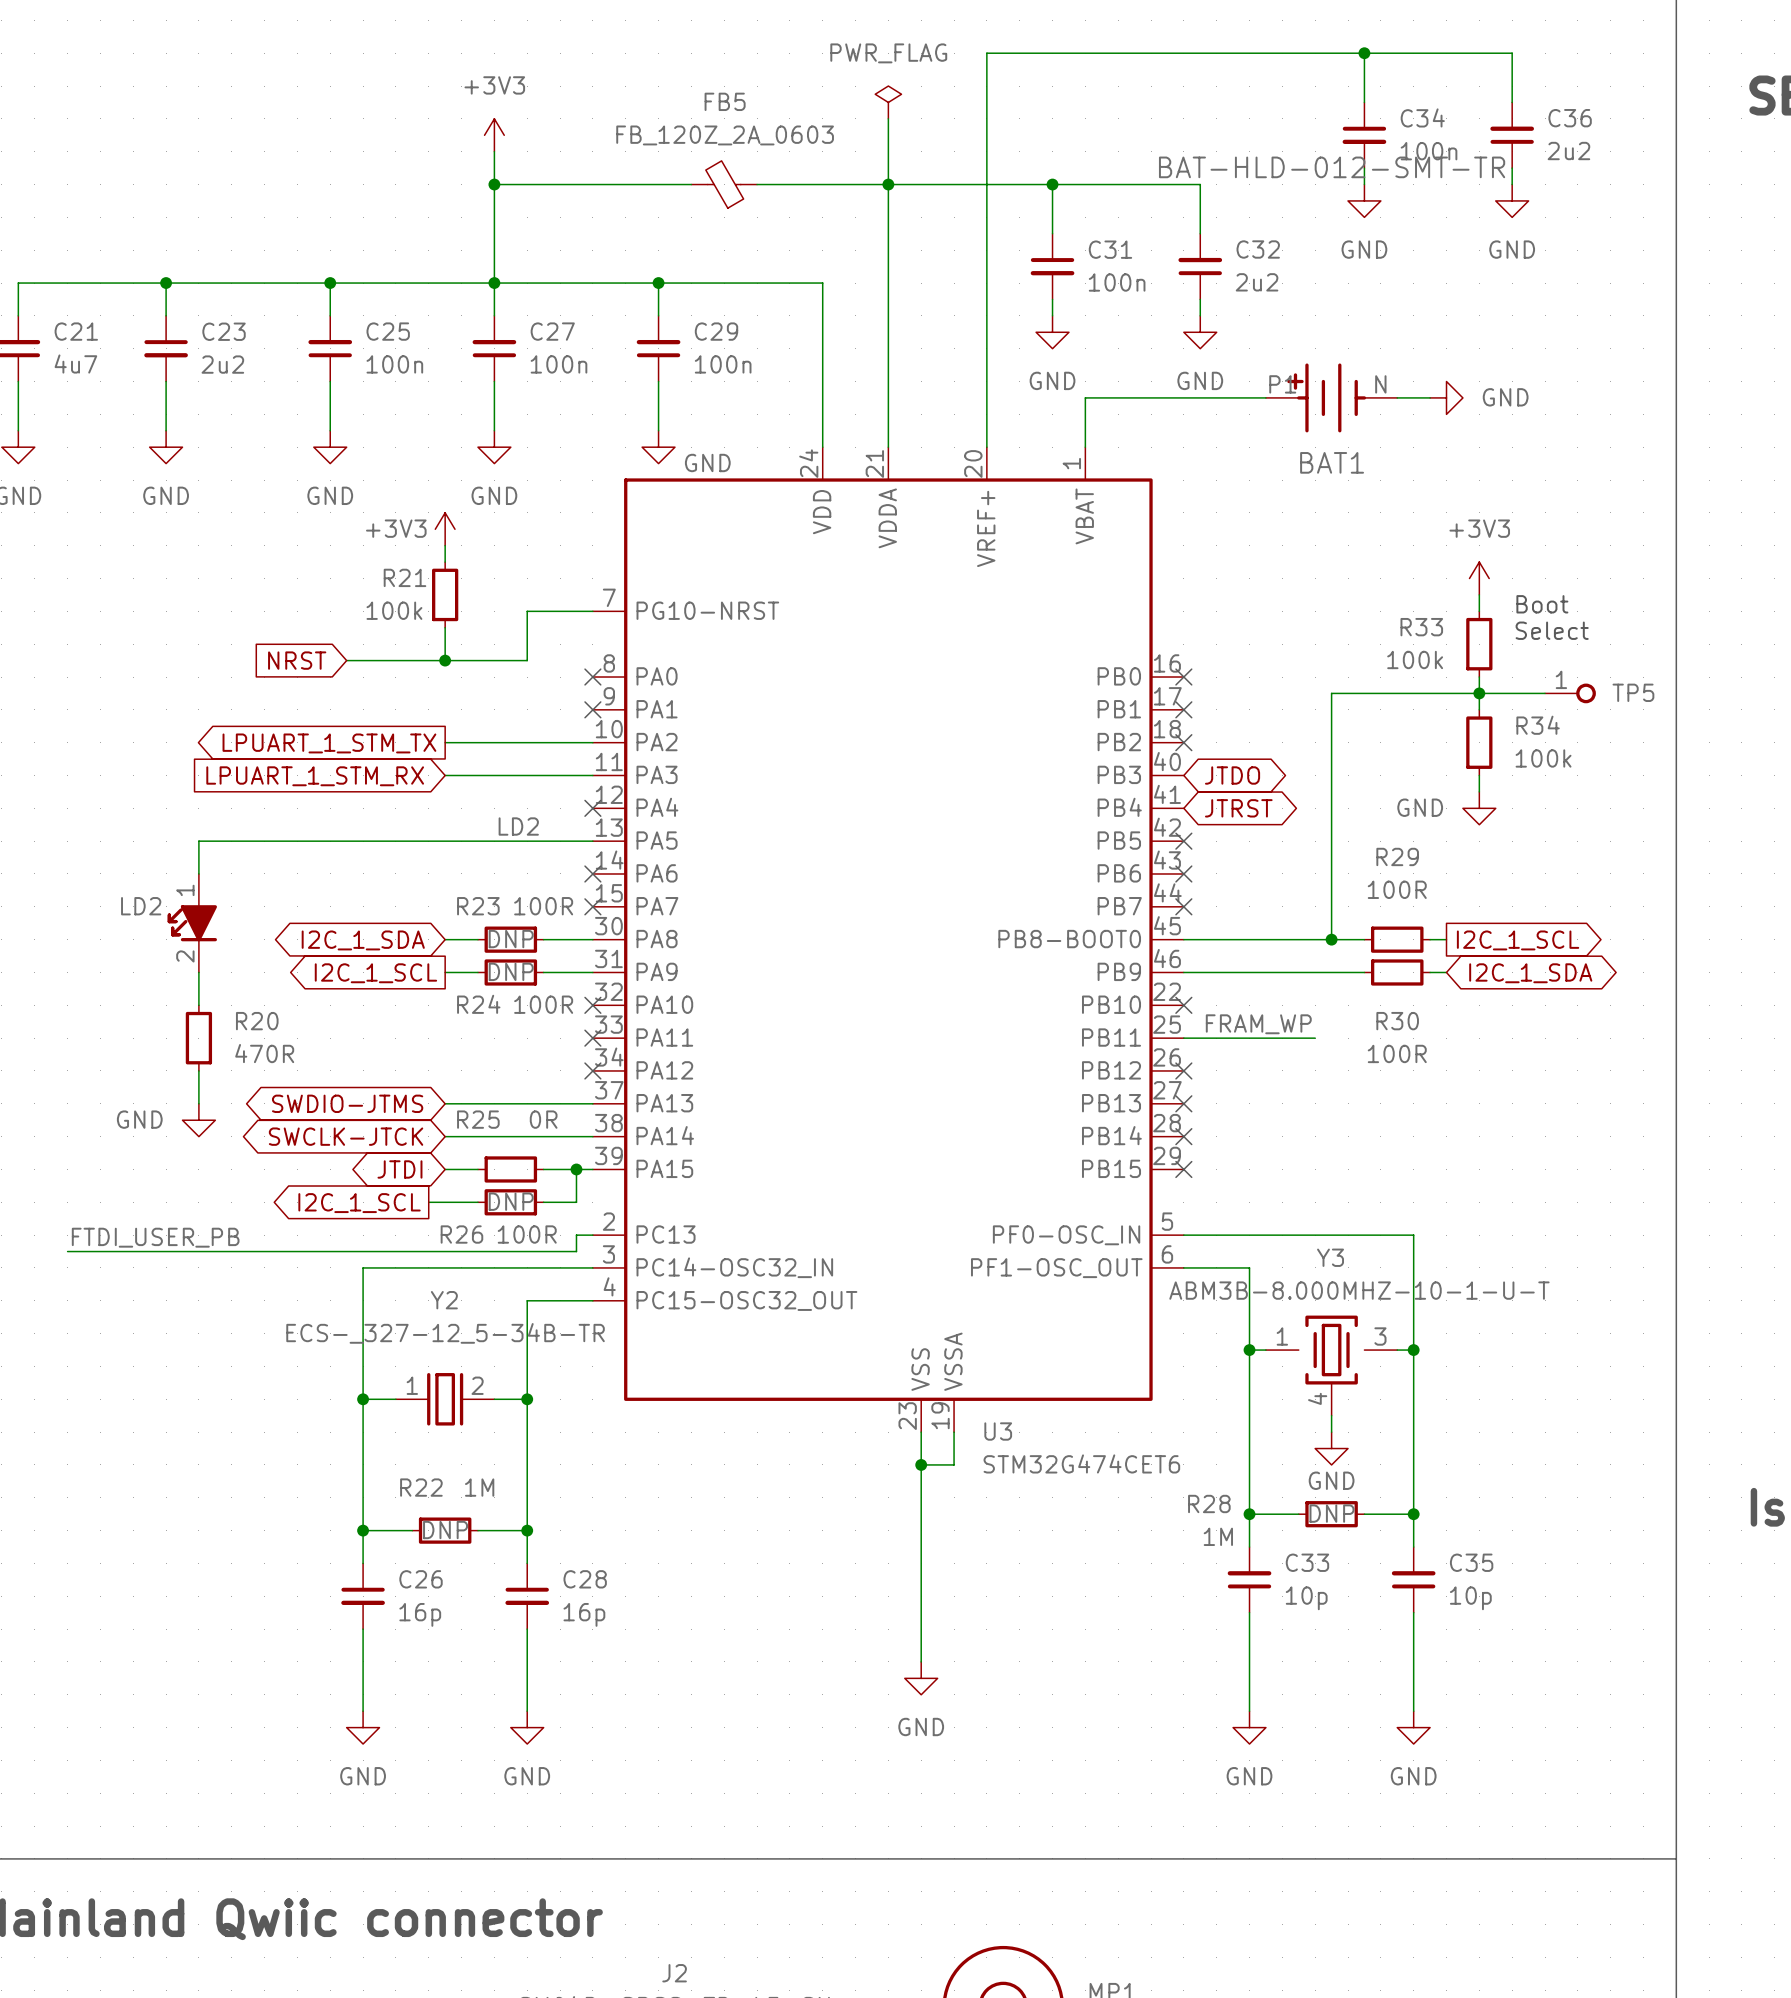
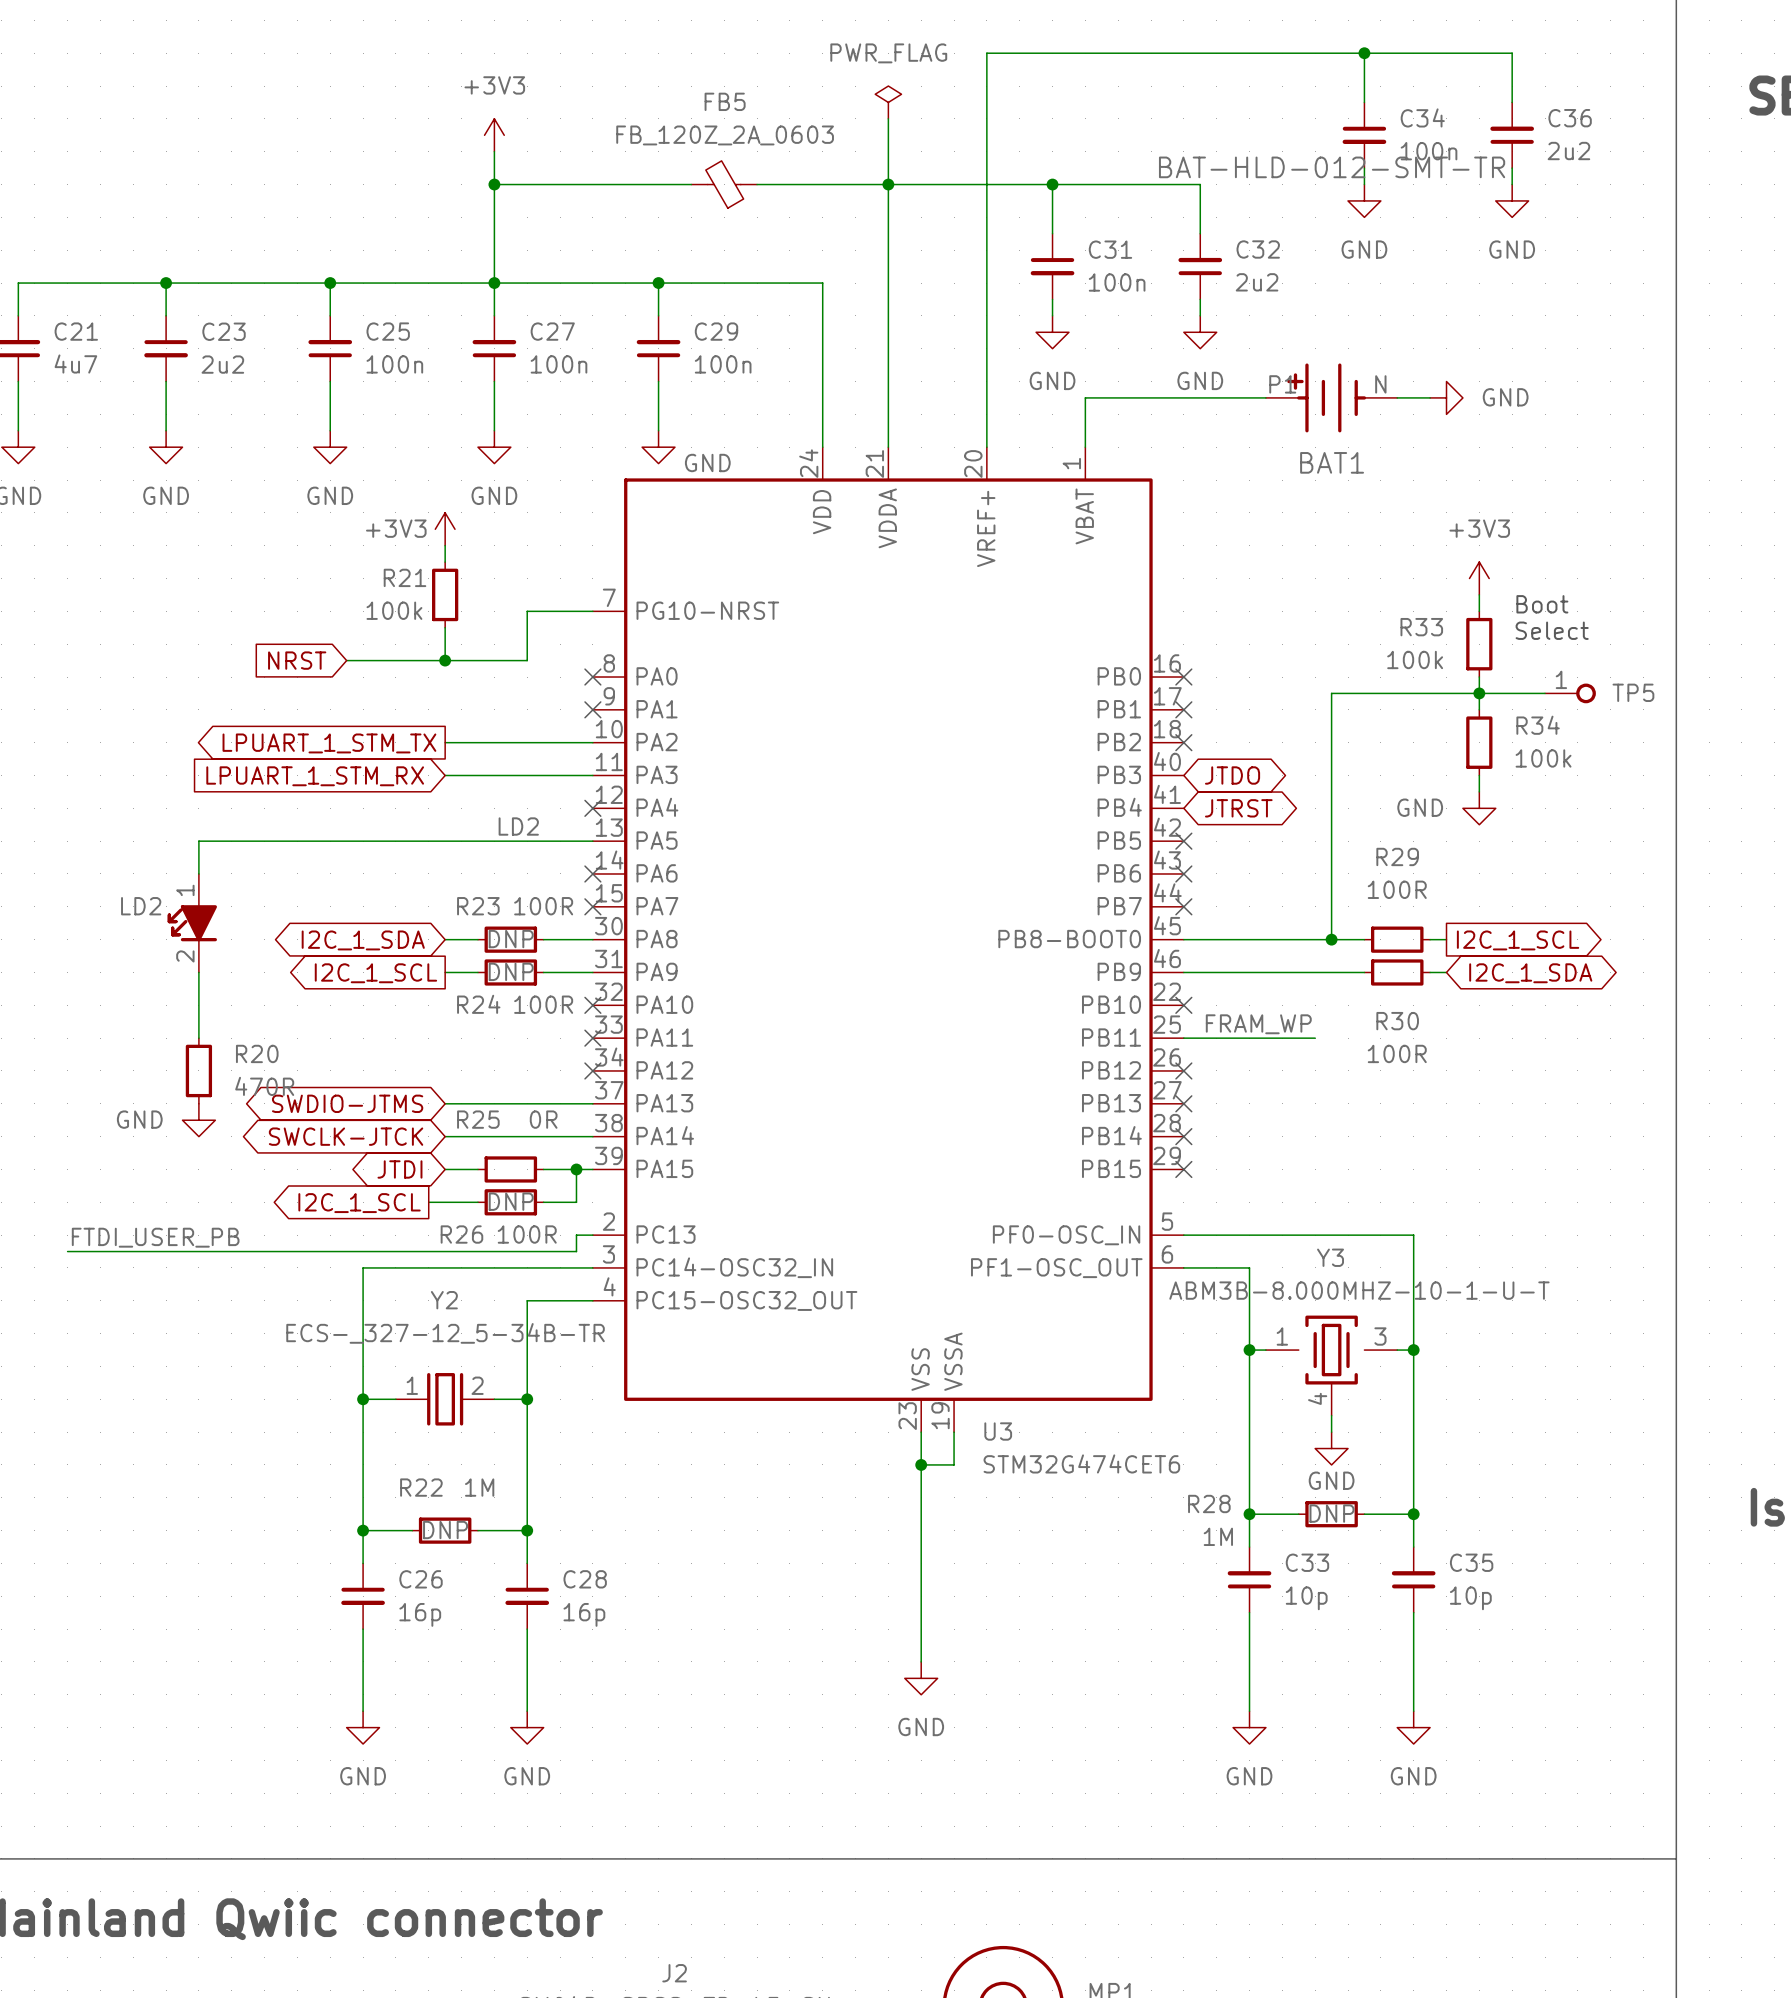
R20 position: (198, 1038) -> (198, 1070)
wire: (198, 1070) (198, 1103) -> (198, 1005) (198, 1038)

